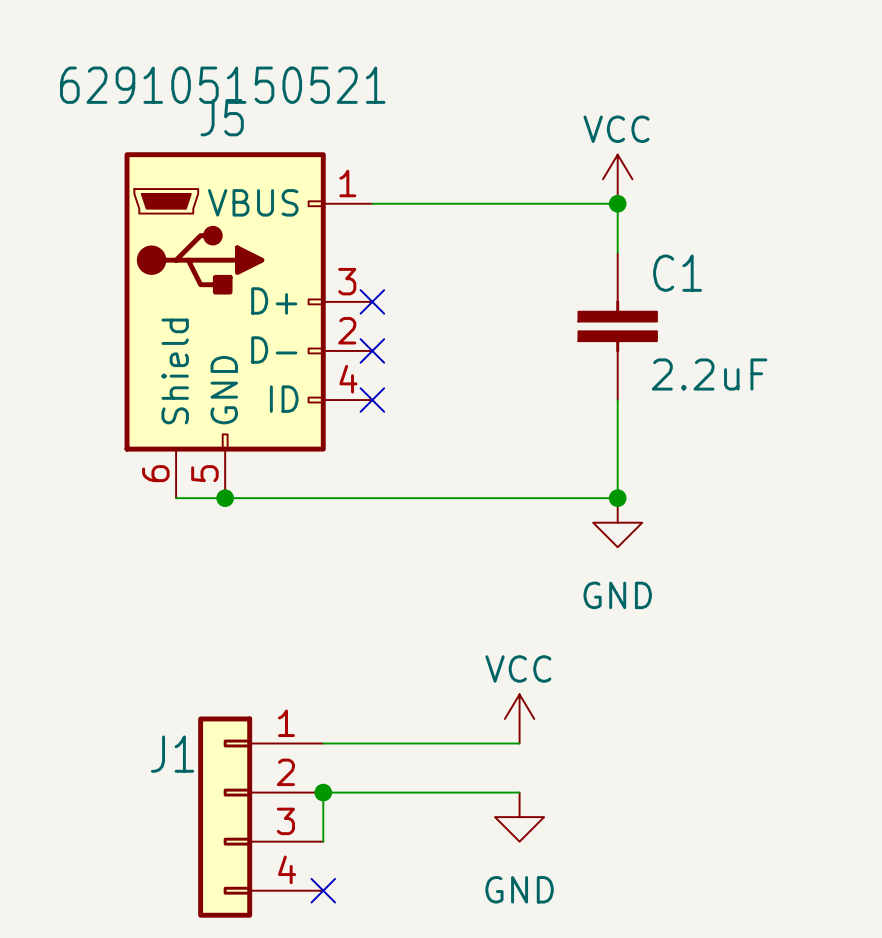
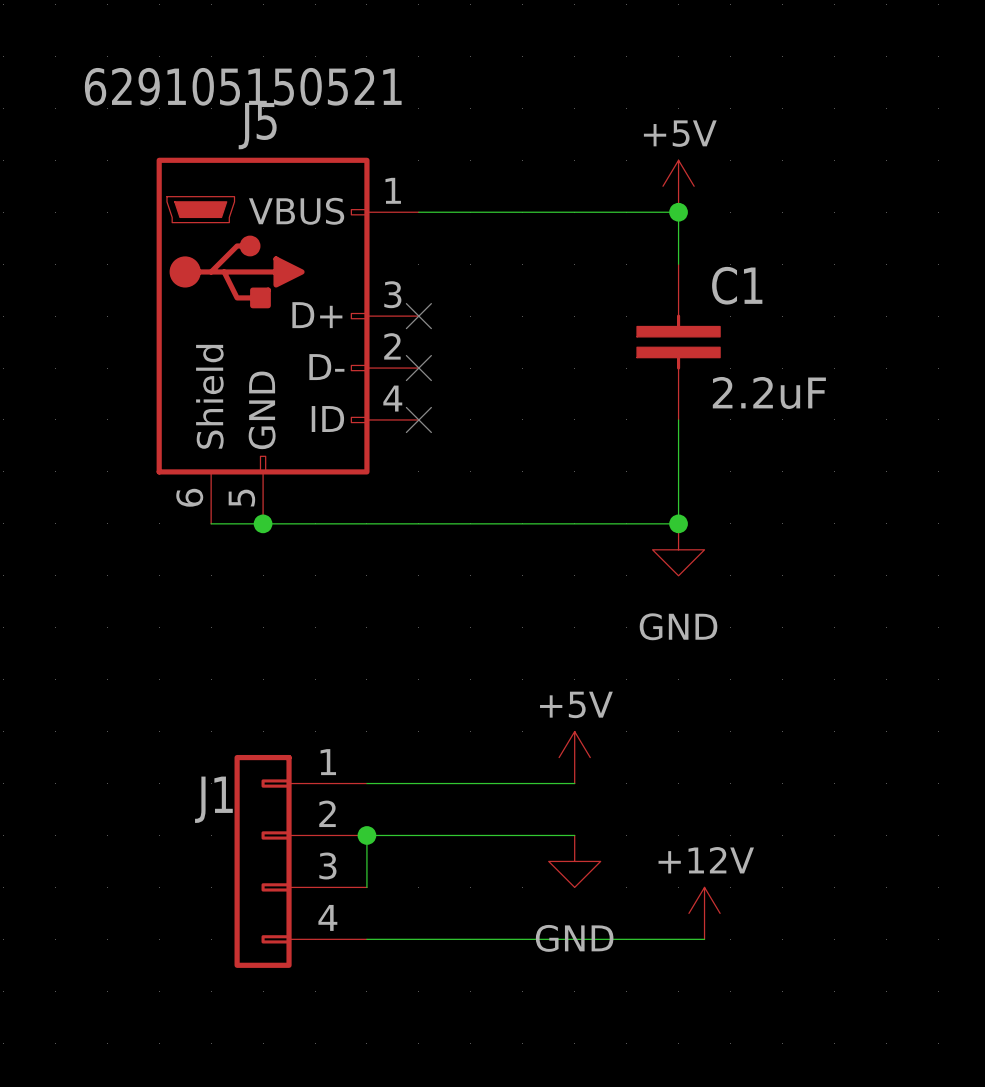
power symbol: VCC (617, 179) -> +5V (678, 186)
power symbol: VCC (519, 718) -> +5V (574, 757)
power symbol: none -> +12V (704, 913)
wire: none -> (366, 939) (704, 939)
no-connect mark: (323, 890) -> none

